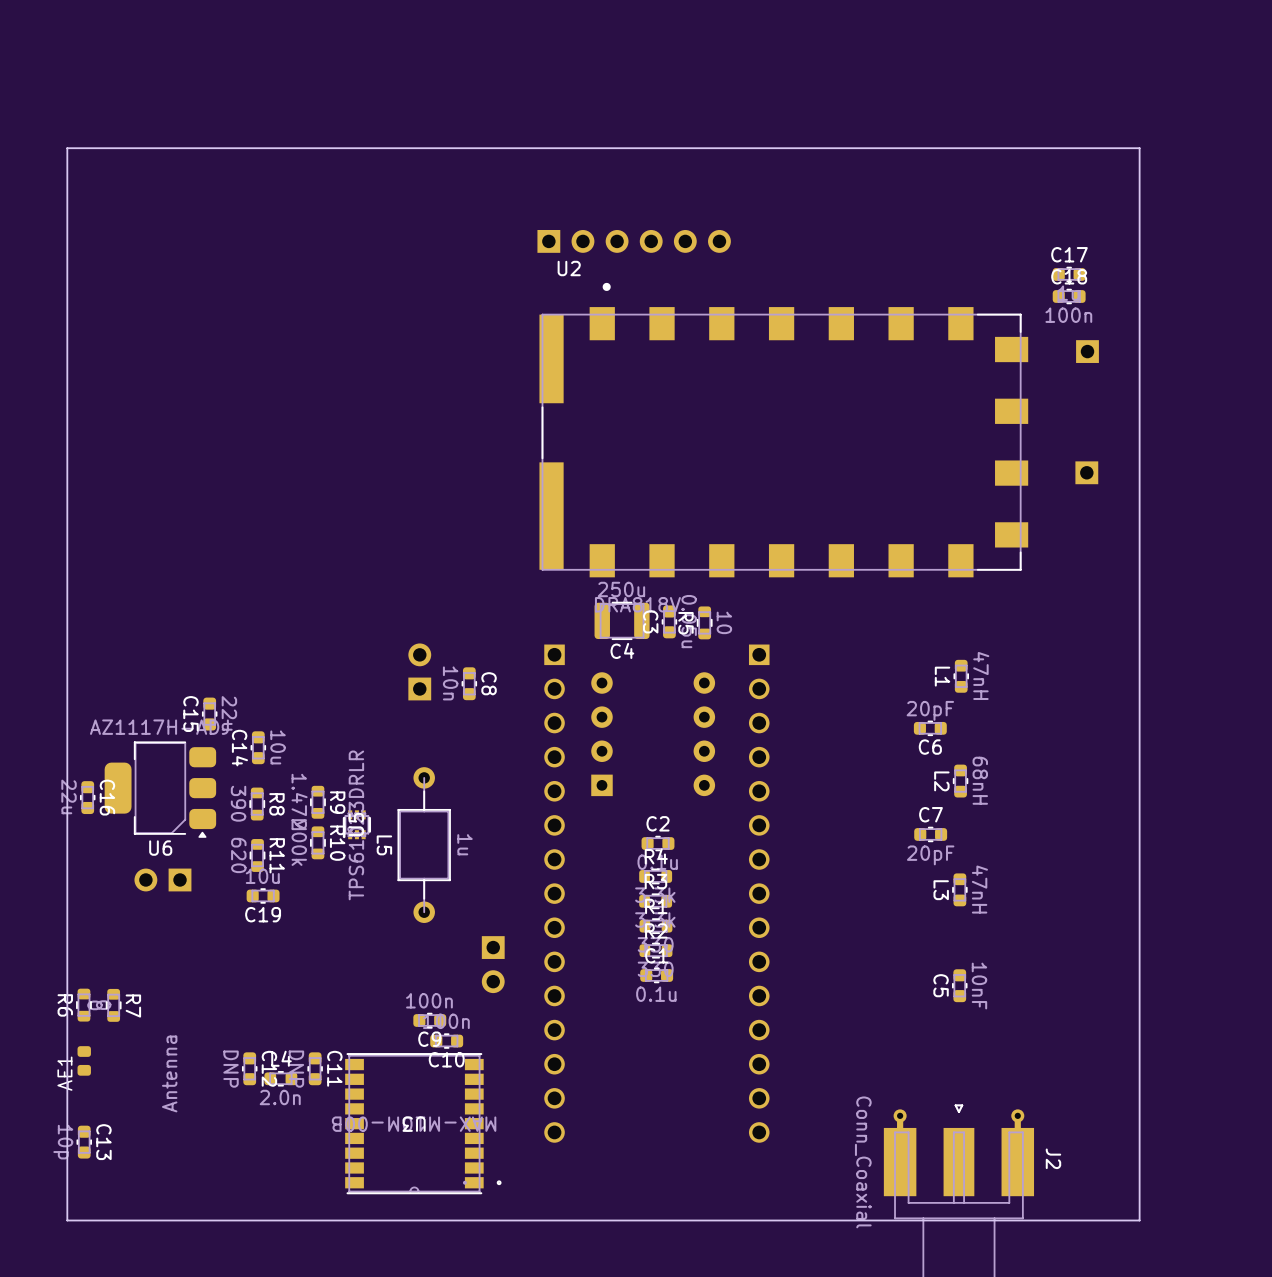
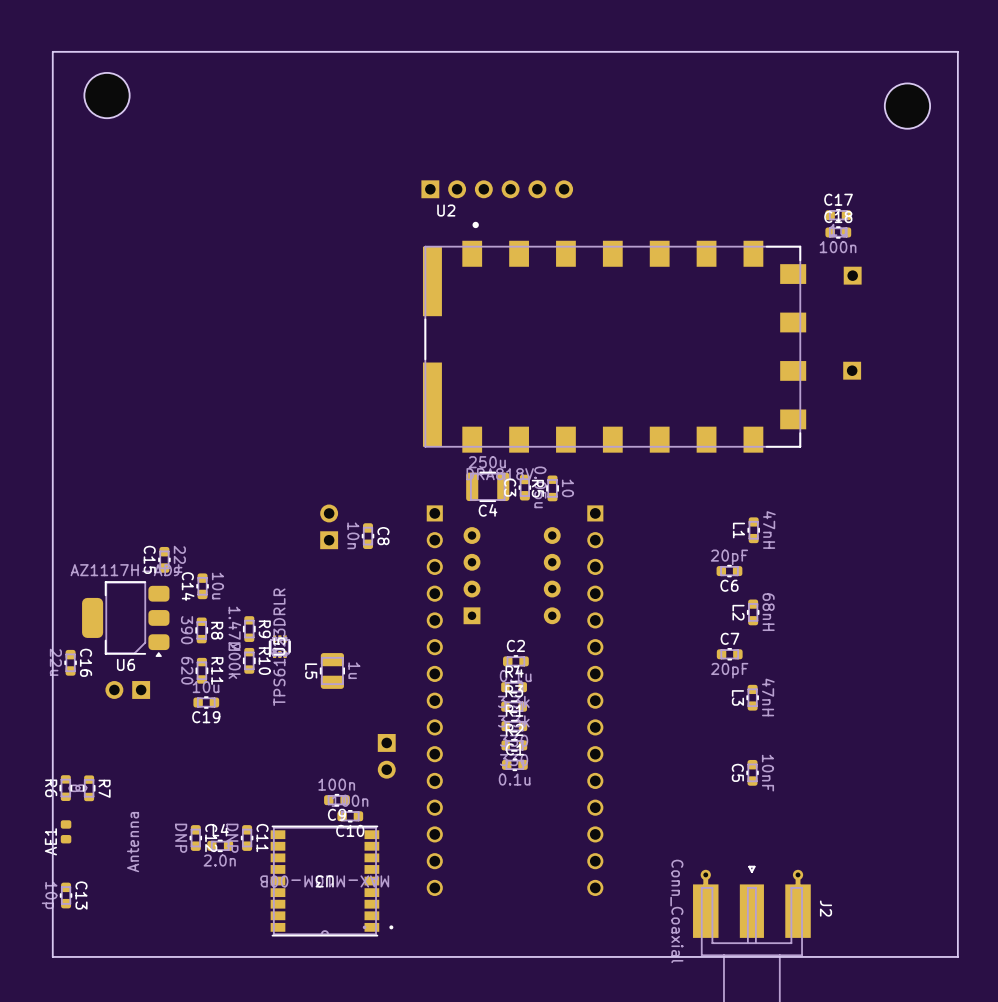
part: none -> (107, 95)
part: none -> (907, 106)
board edge: (67, 148) (1139, 148) (1139, 1220) -> (52, 116) (52, 51) (957, 51) (957, 956) (893, 956)
L5 footprint: [397, 767, 451, 923] -> [320, 653, 345, 689]
C16 position: (87, 797) -> (70, 662)

